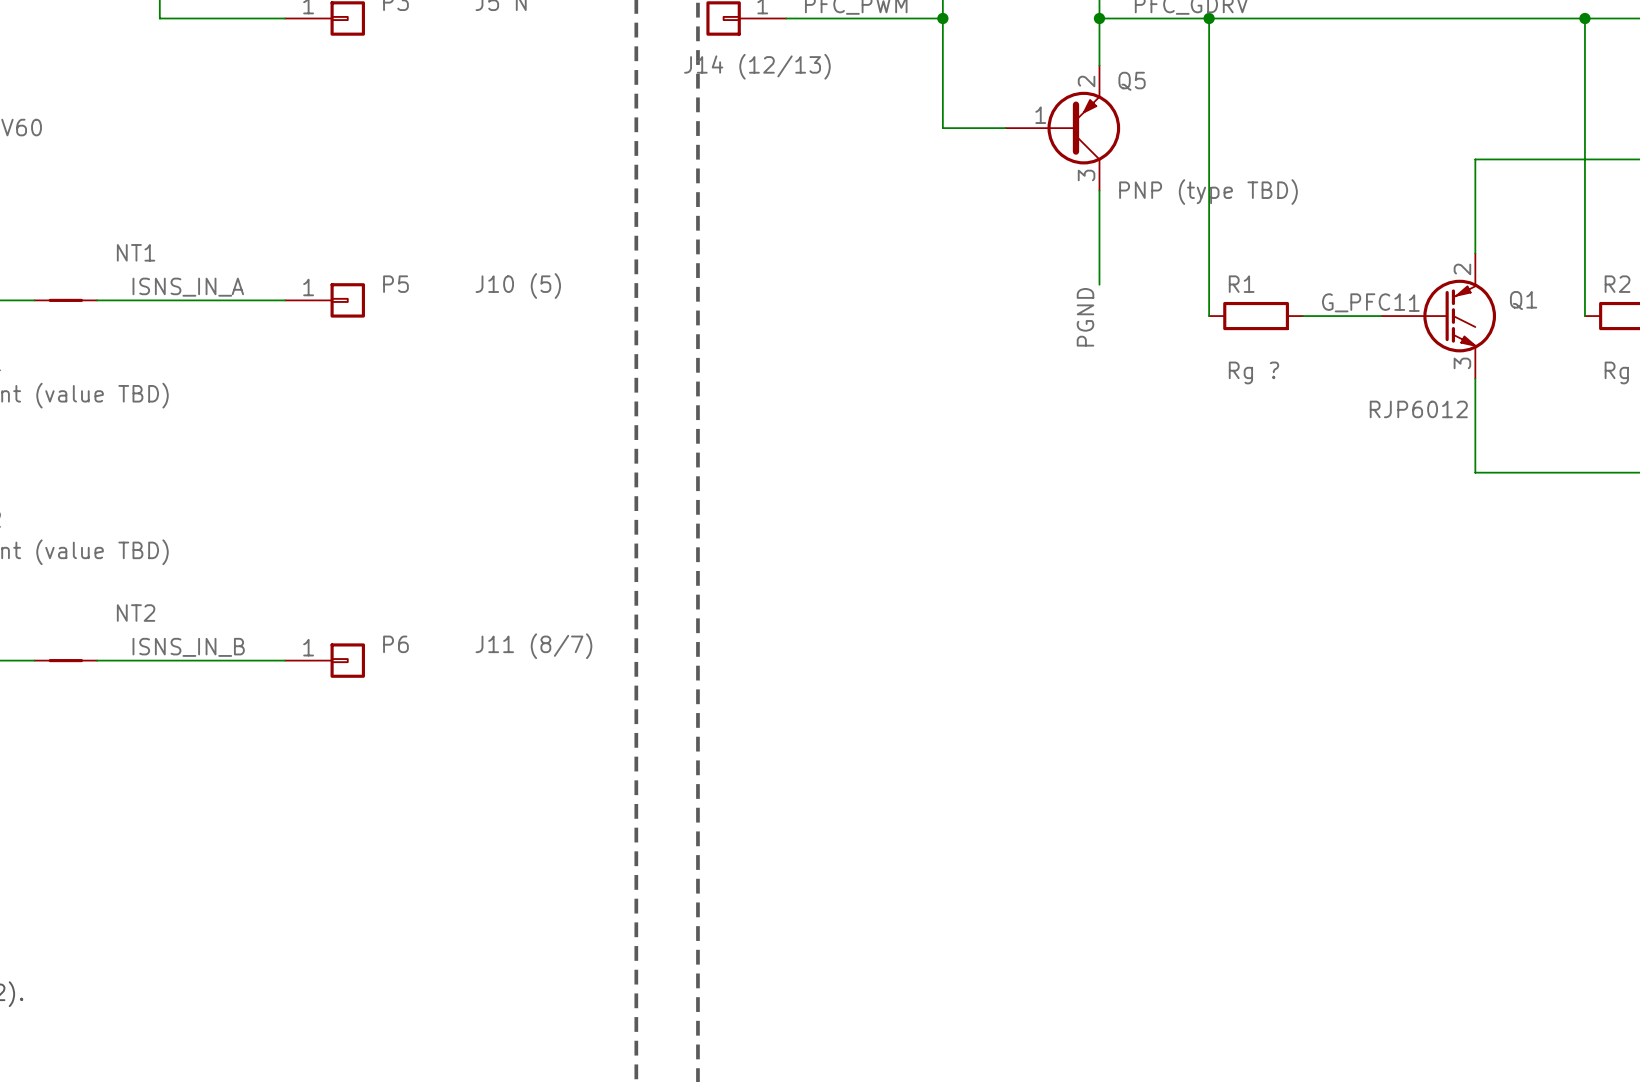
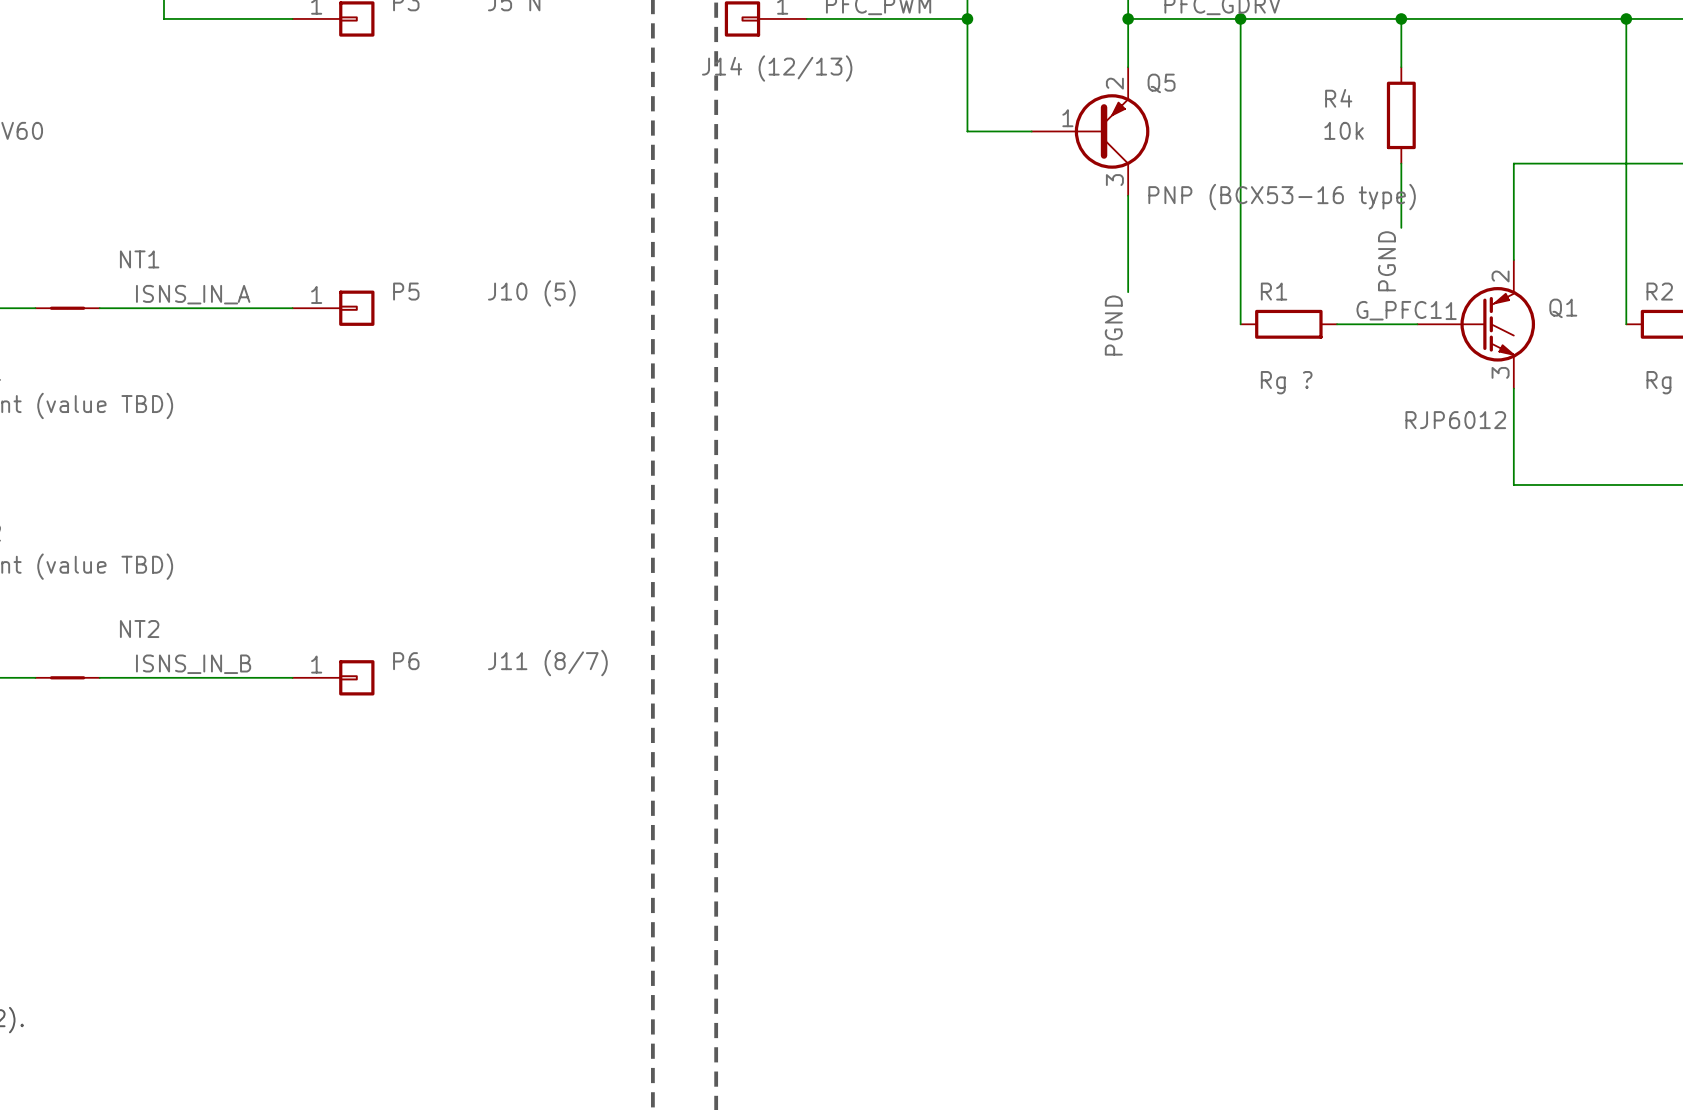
wire: none -> (1401, 18) (1401, 67)
junction: none -> (1401, 18)
R4: none -> 10k (1401, 115)
wire: none -> (1401, 163) (1401, 227)
Q5 value: PNP (type TBD) (1208, 192) -> PNP (BCX53-16 type) (1282, 197)
label: none -> PGND (1386, 261)

